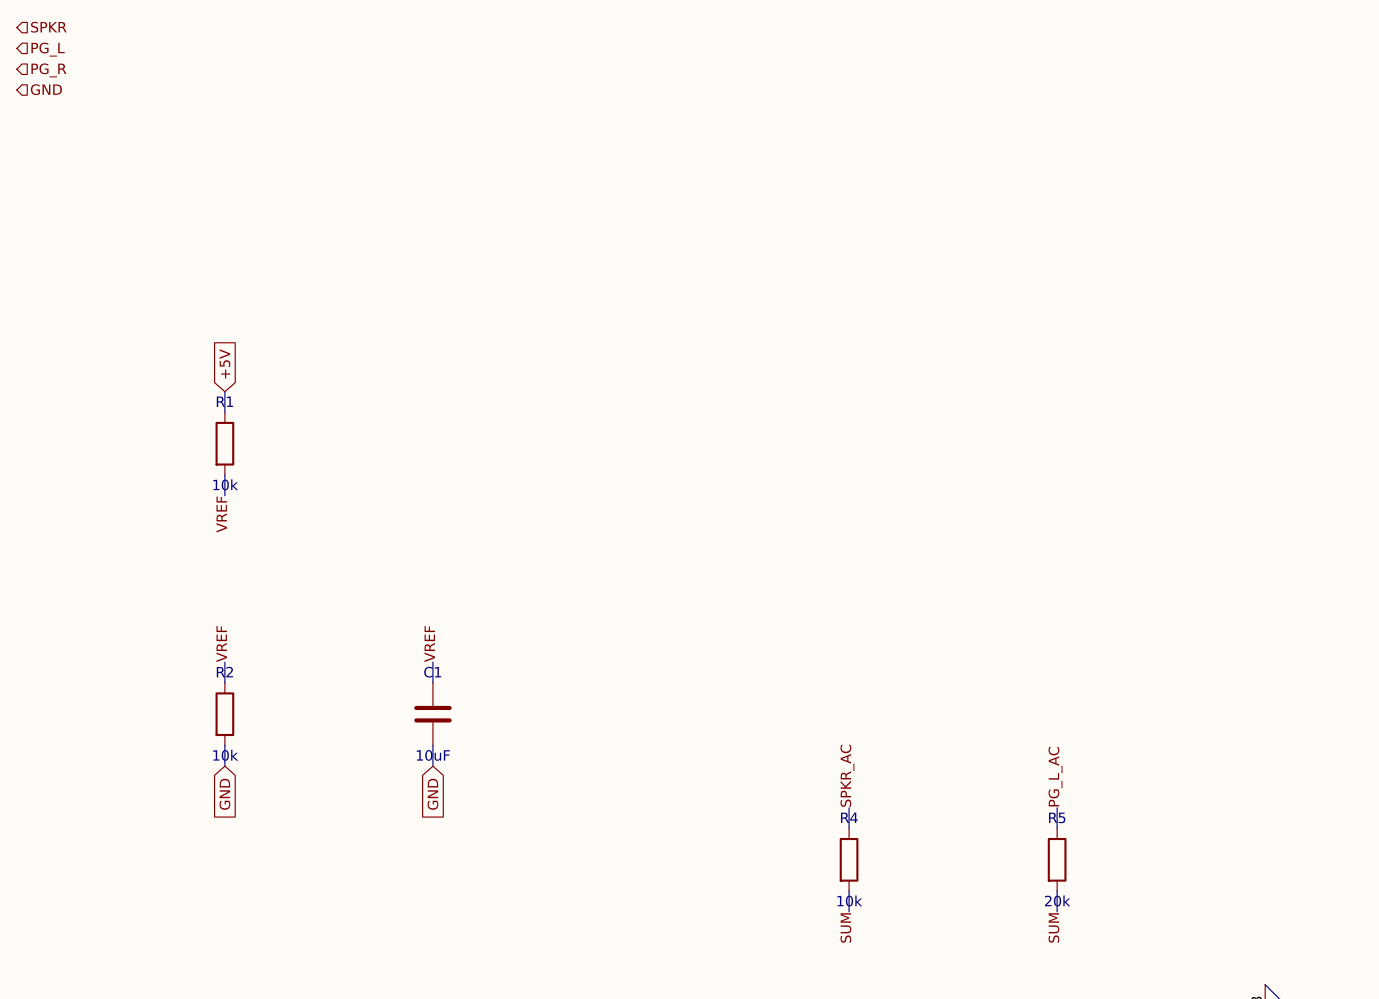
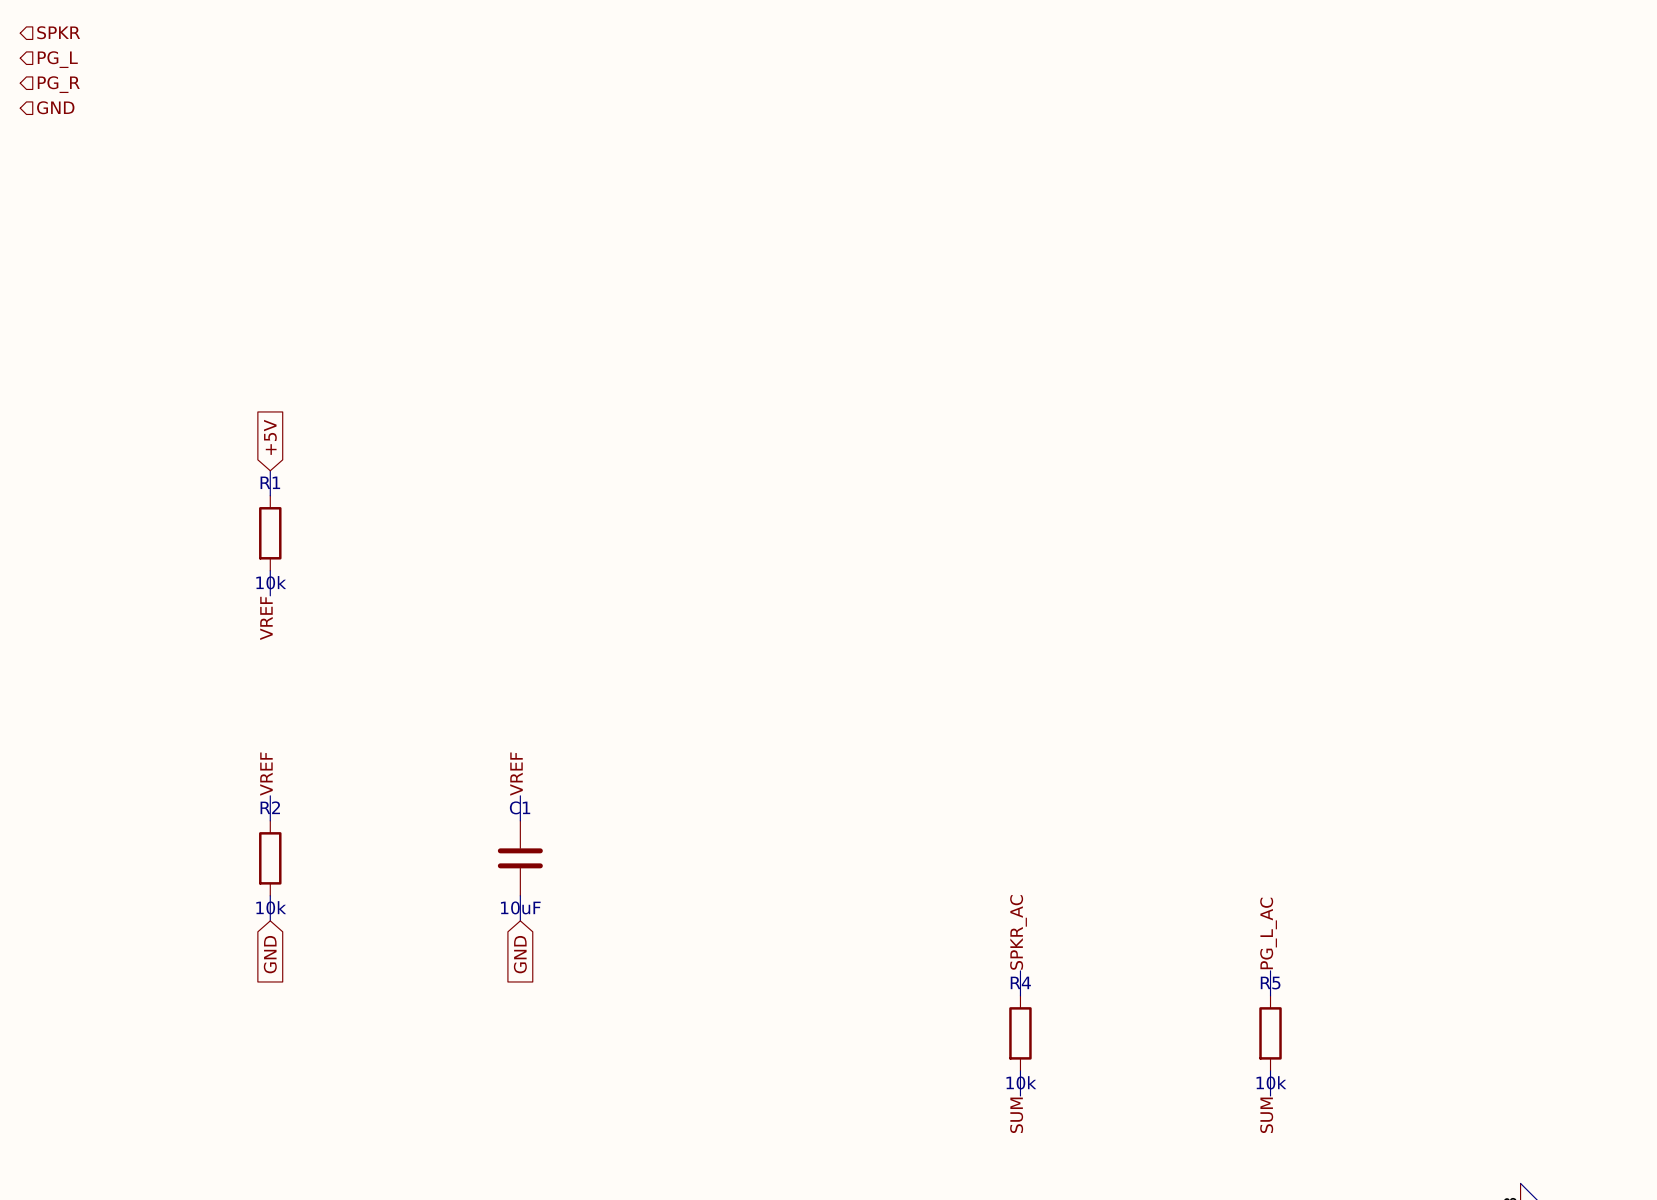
R5 value: 20k (1057, 900) -> 10k (1271, 1082)

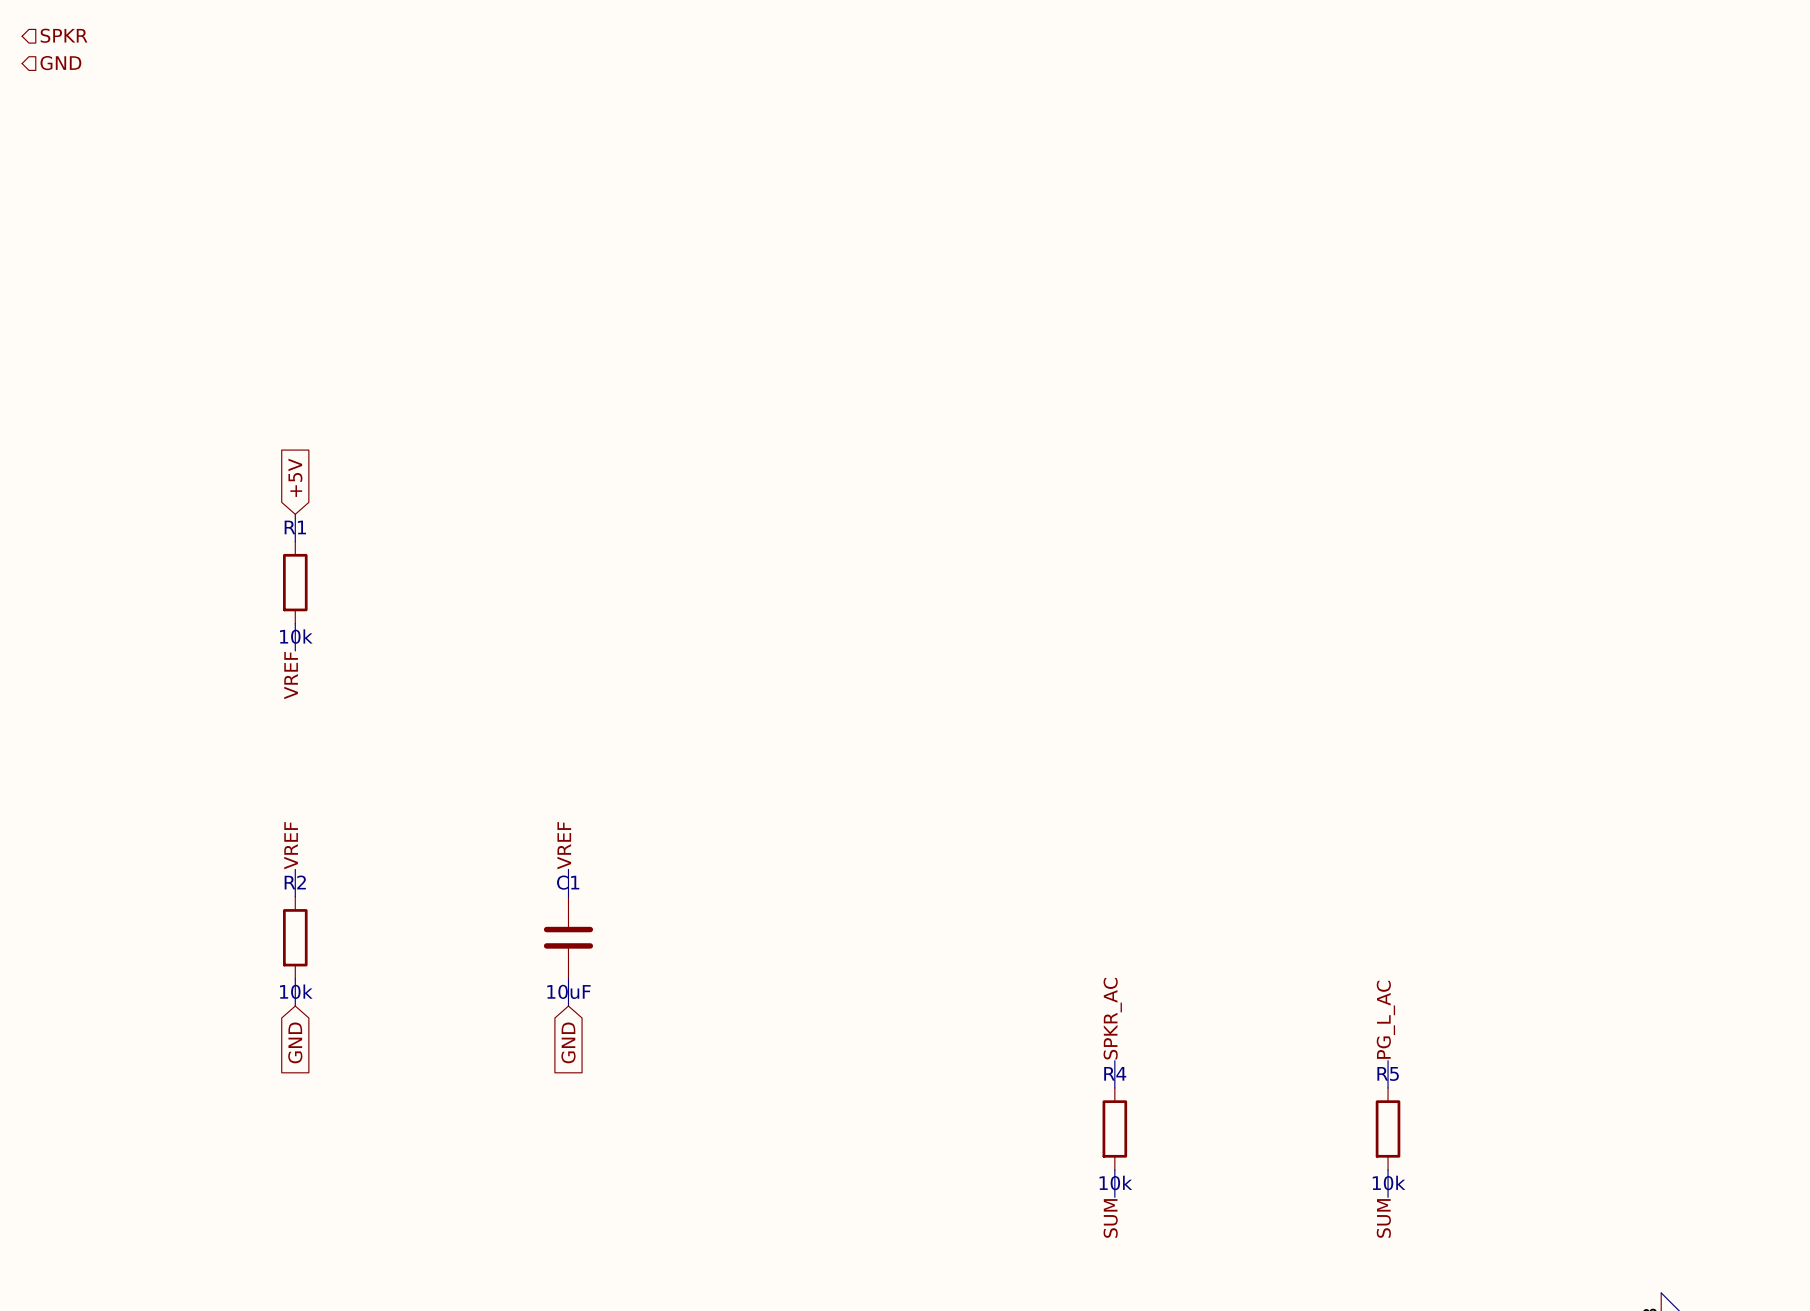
hierarchical label: PG_L (57, 59) -> GND (60, 63)
hierarchical label: PG_R (58, 84) -> none
hierarchical label: GND (55, 107) -> none

